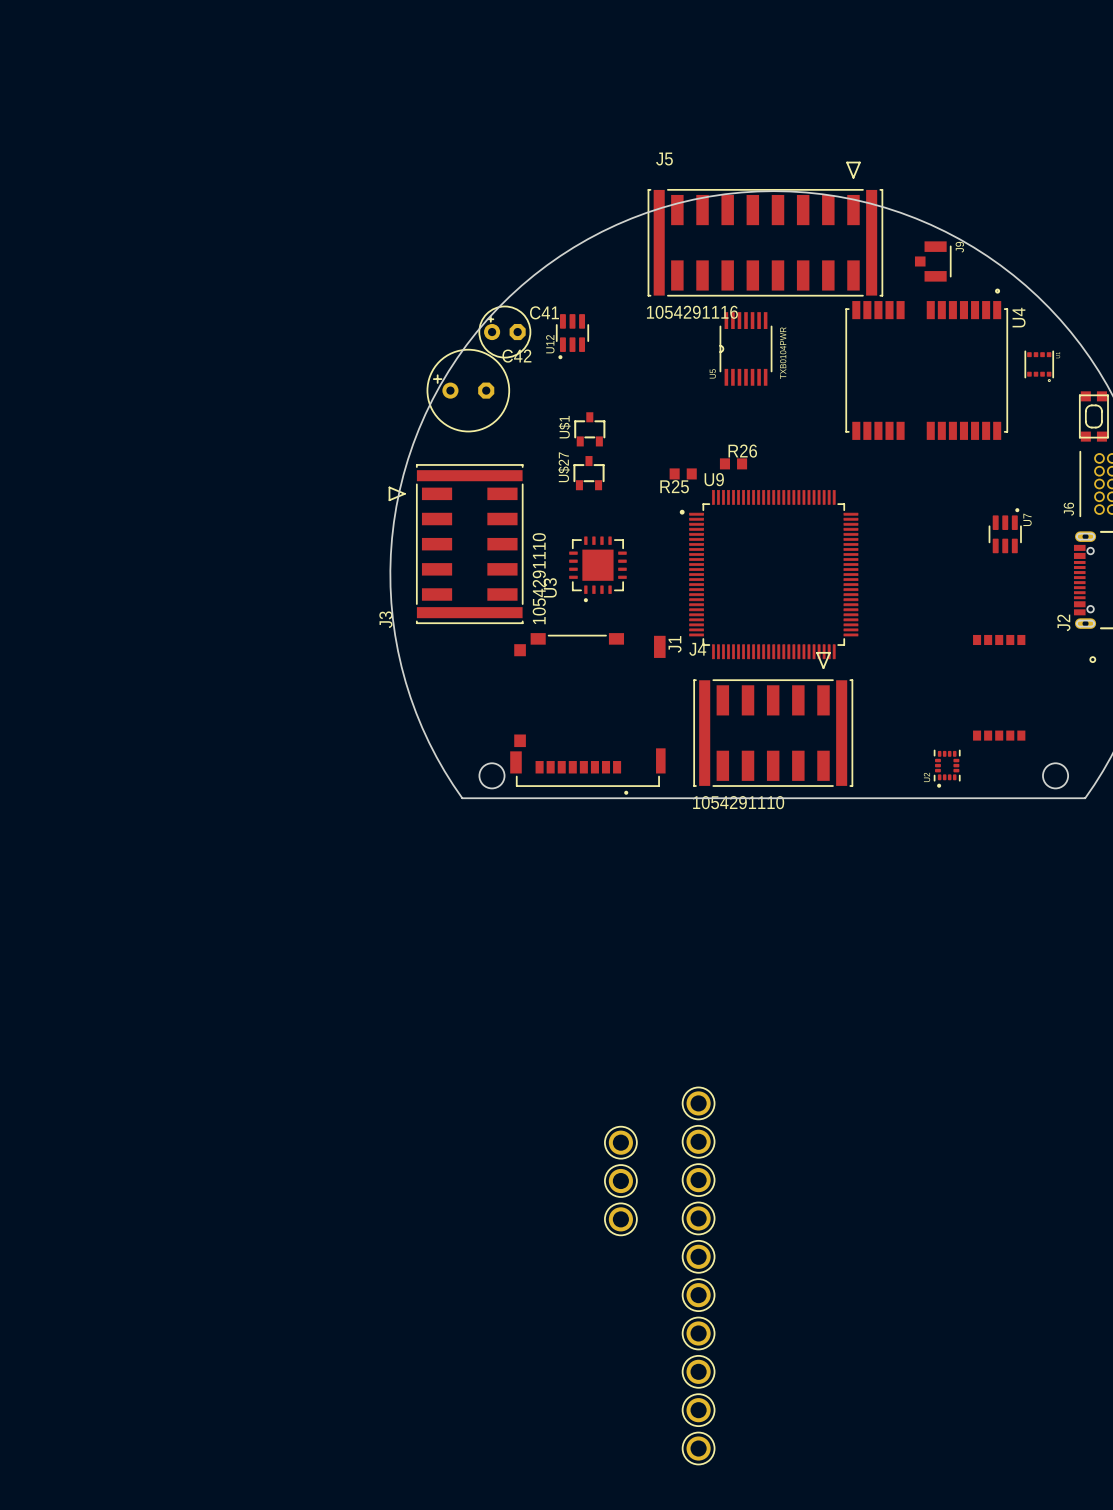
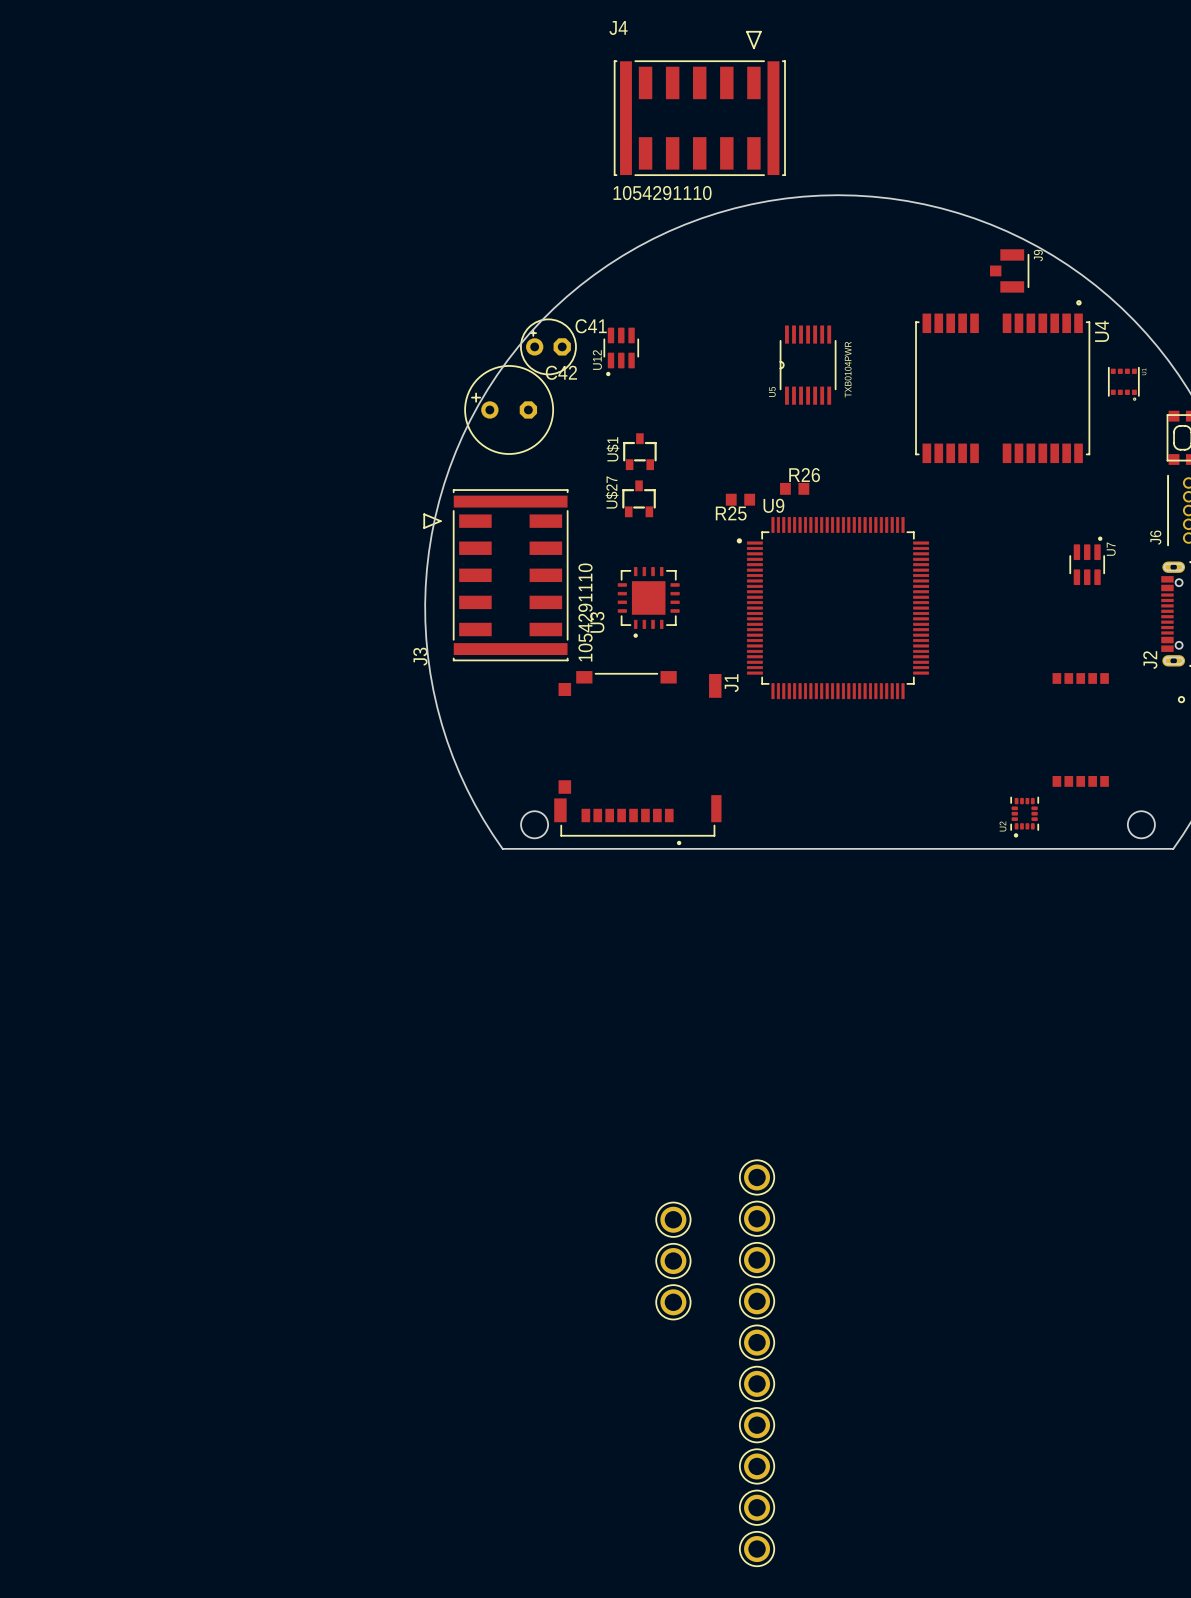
J5: 1054291116 (765, 229) -> none
J4 position: (773, 719) -> (699, 103)

